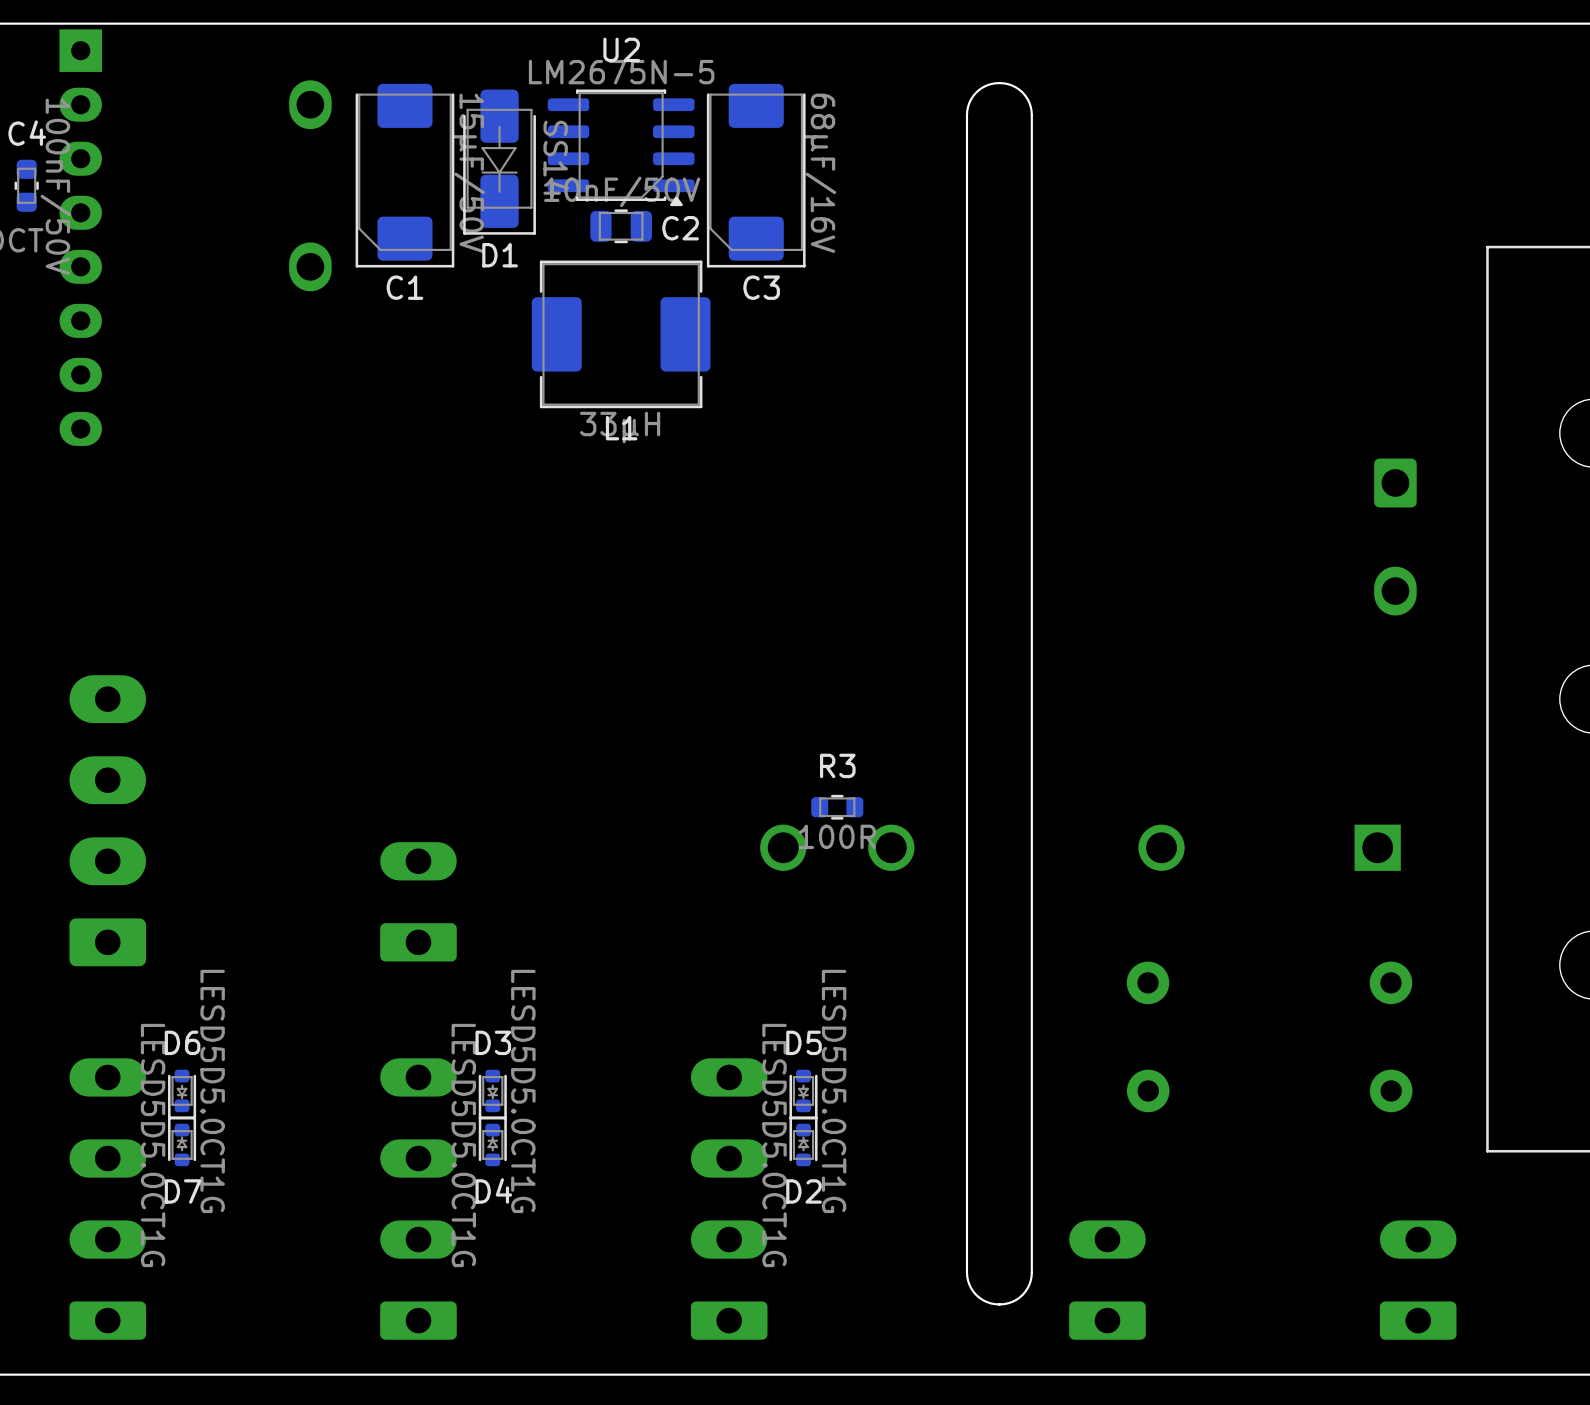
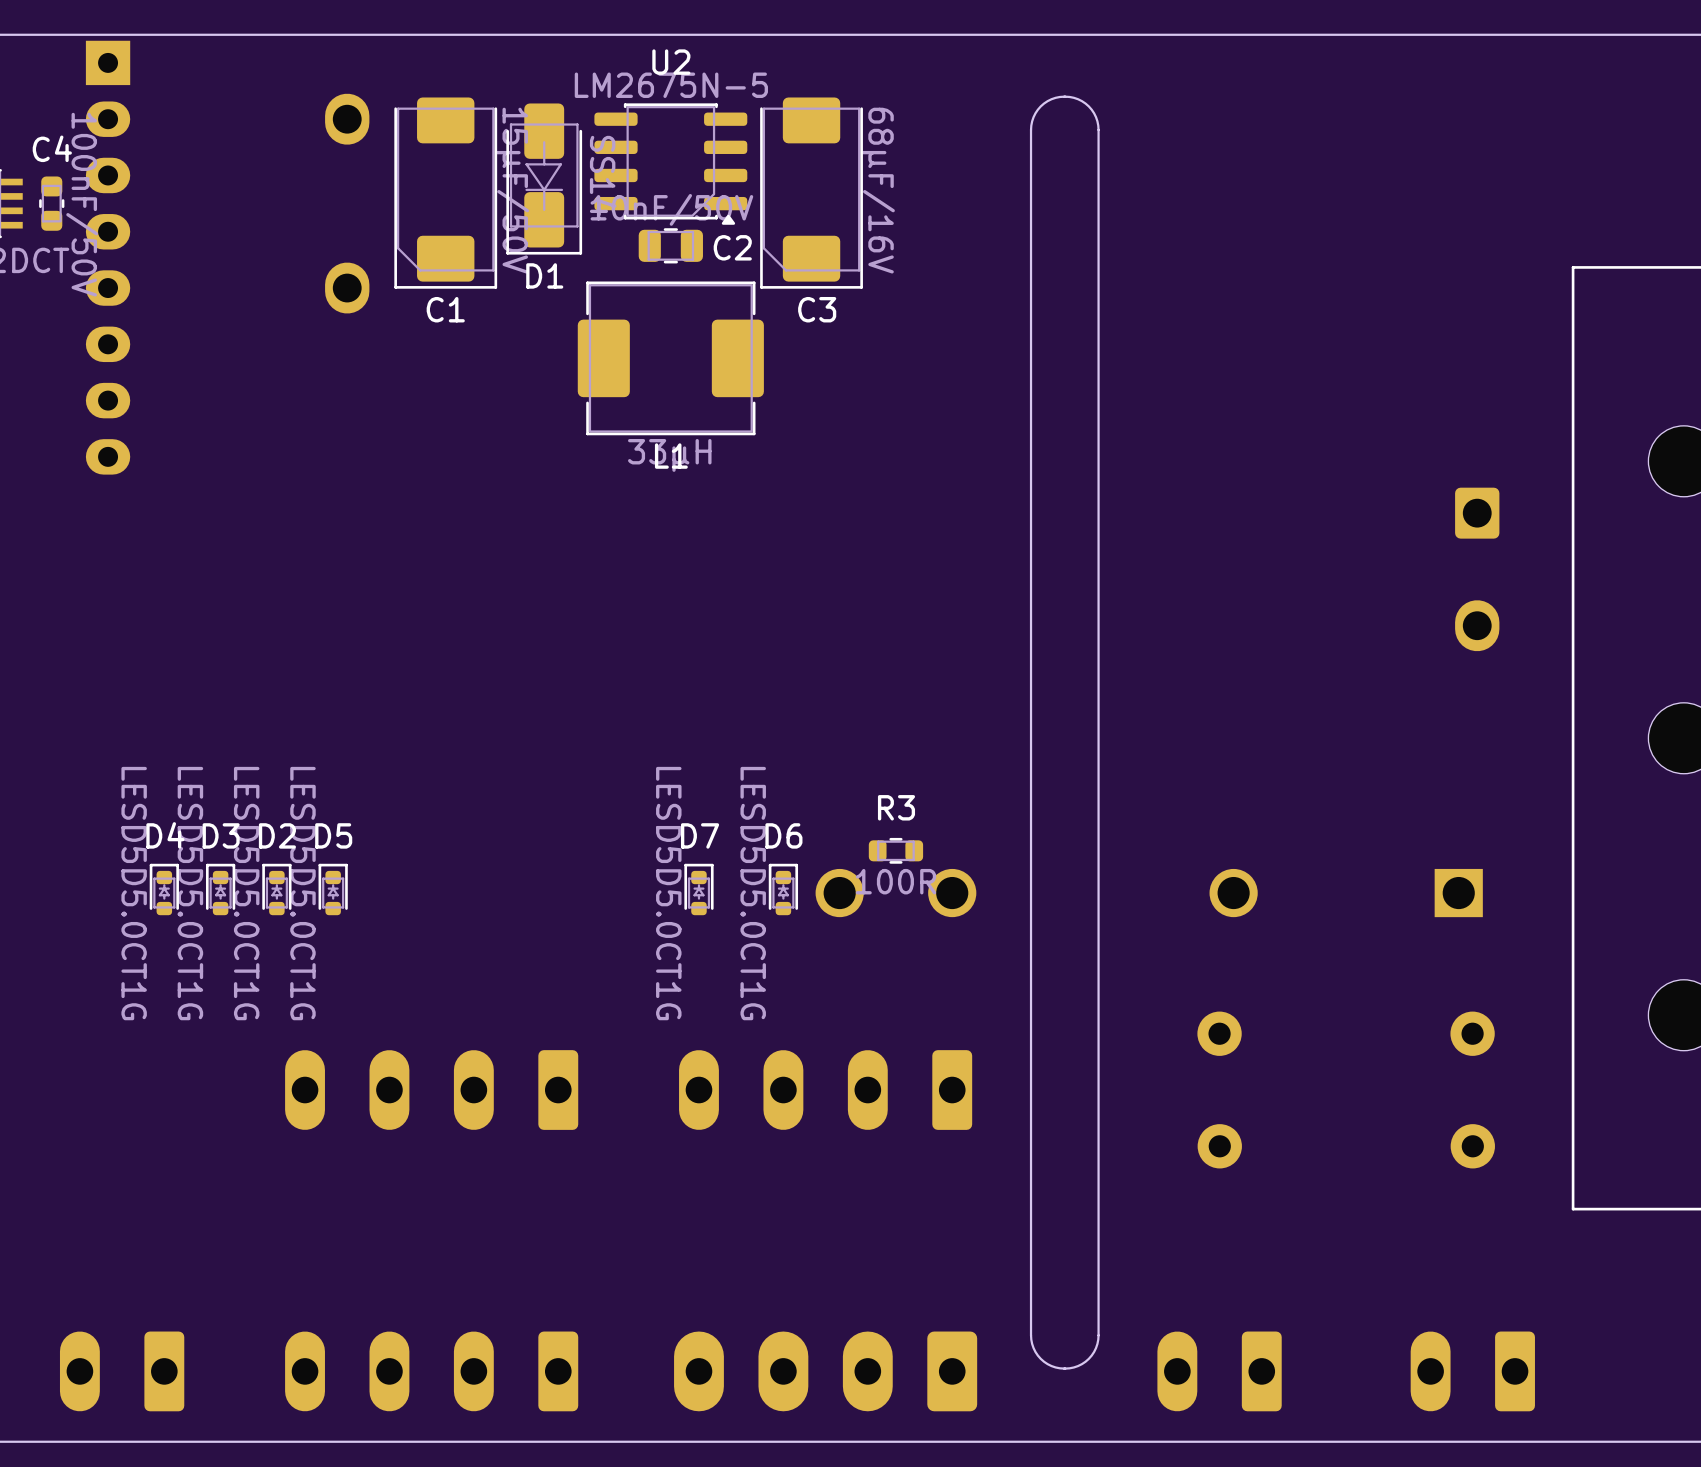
part: (107, 820) -> none
part: (418, 901) -> none
part: none -> (431, 1090)
D6 rotation: 0° (182, 1094) -> 180° (783, 889)
D6 position: (182, 1094) -> (783, 889)
D3 rotation: 0° (492, 1094) -> 180° (220, 889)
D3 position: (492, 1094) -> (220, 889)
D5 rotation: 0° (803, 1094) -> 180° (333, 889)
D5 position: (803, 1094) -> (333, 889)
D7 position: (182, 1141) -> (698, 889)
D4 position: (492, 1141) -> (164, 889)
D2 position: (803, 1141) -> (276, 889)
D4 name position: D4 (493, 1190) -> D4 (165, 835)
D7 name position: D7 (183, 1191) -> D7 (700, 835)
D2 name position: D2 (804, 1191) -> D2 (277, 835)
part: (107, 1199) -> none
part: (418, 1199) -> none
part rotation: 0° (729, 1199) -> 90° counterclockwise (825, 1090)
part rotation: 0° (1107, 1280) -> 90° counterclockwise (1219, 1371)
part rotation: 0° (1418, 1280) -> 90° counterclockwise (1472, 1371)
part: none -> (122, 1371)
part: none -> (431, 1371)
part: none -> (825, 1371)

